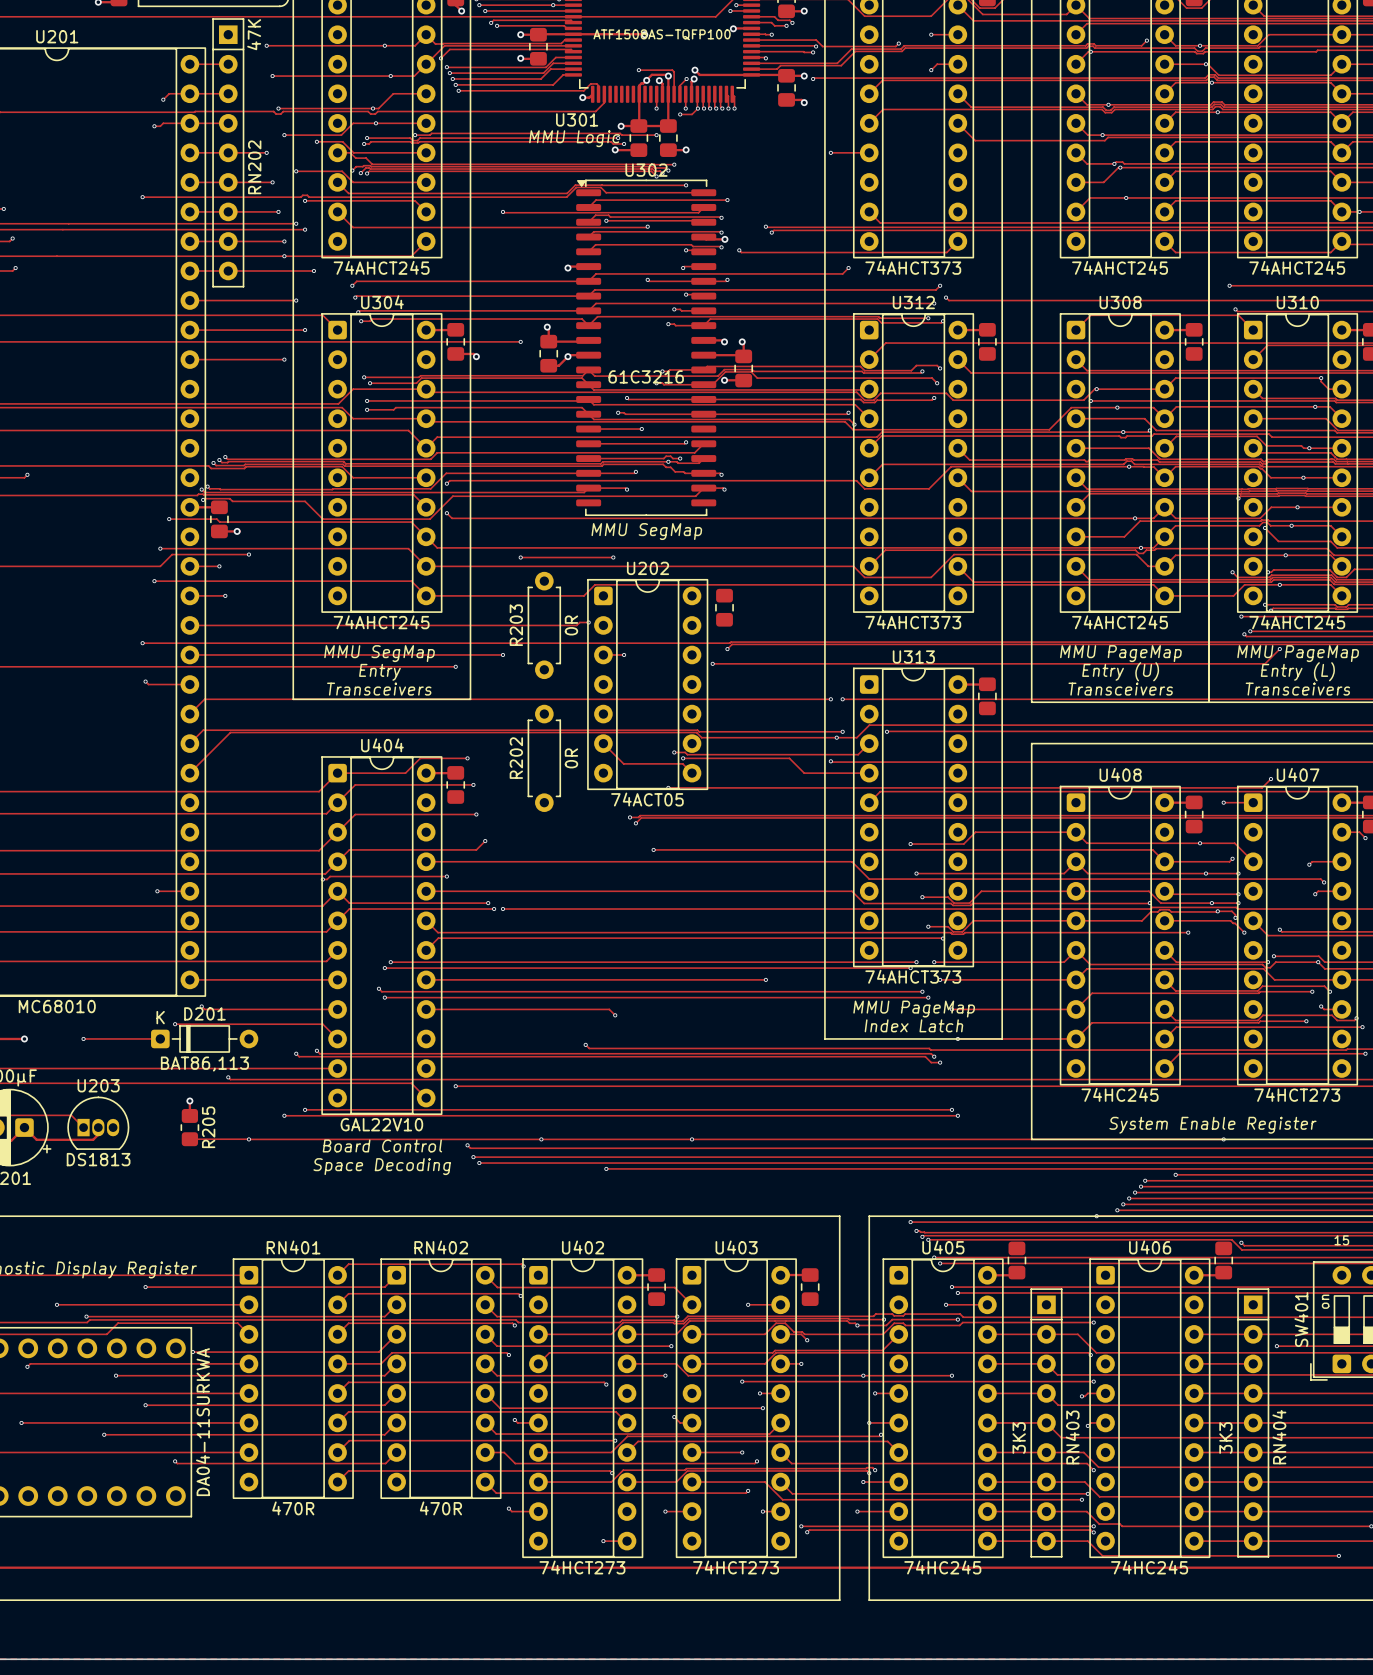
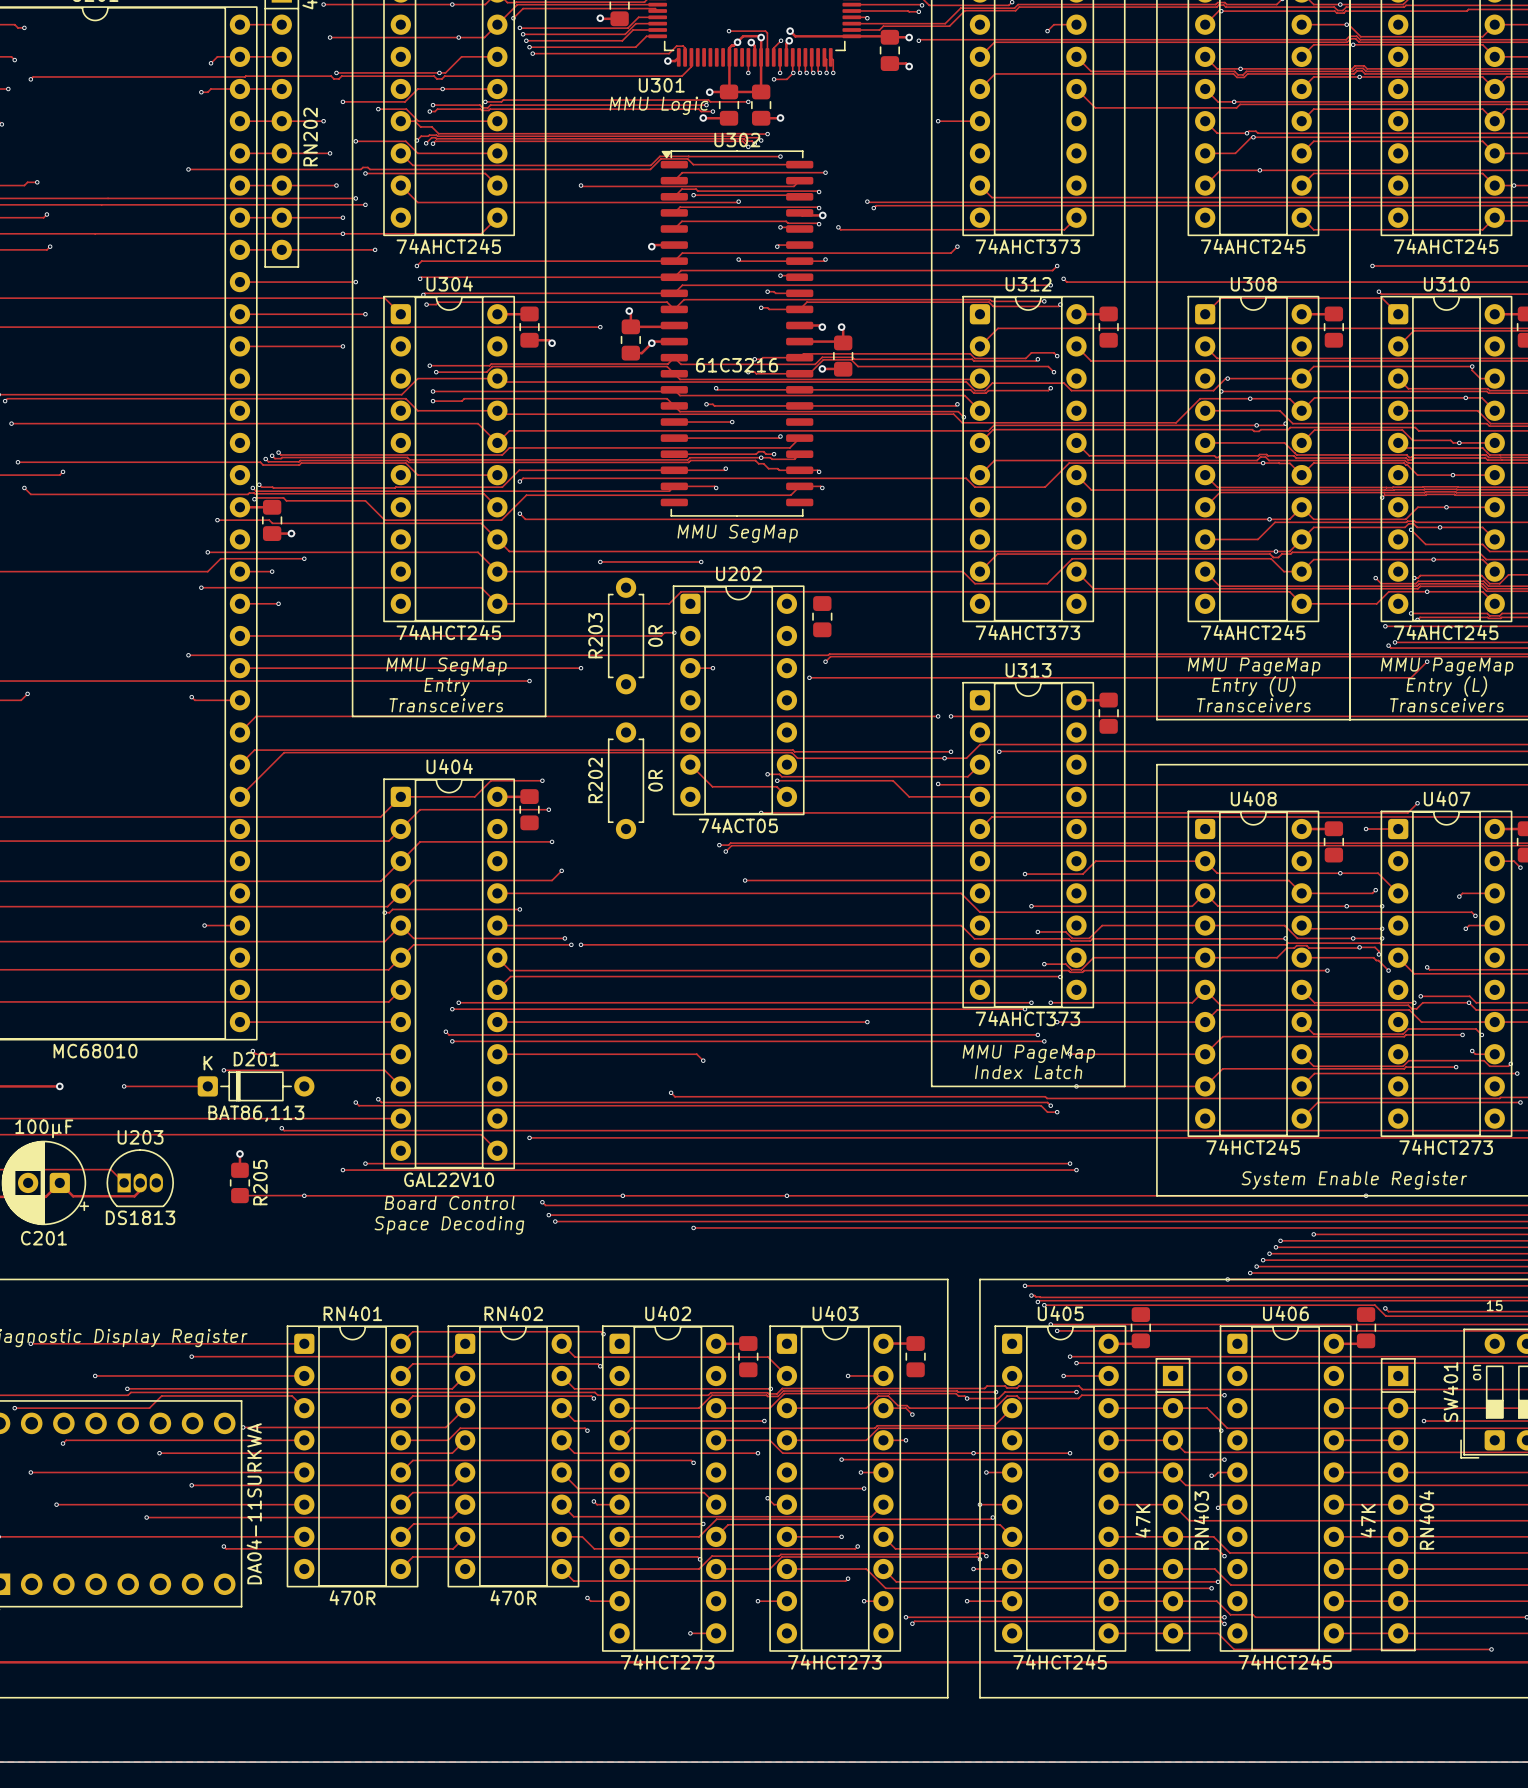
U408 value: 74HC245 (1120, 1094) -> 74HCT245 (1253, 1147)
RN403 value: 3K3 (1019, 1438) -> 47K (1142, 1520)
RN404 value: 3K3 (1225, 1438) -> 47K (1368, 1520)
U405 value: 74HC245 (942, 1567) -> 74HCT245 (1060, 1662)
U406 value: 74HC245 (1149, 1567) -> 74HCT245 (1285, 1662)

